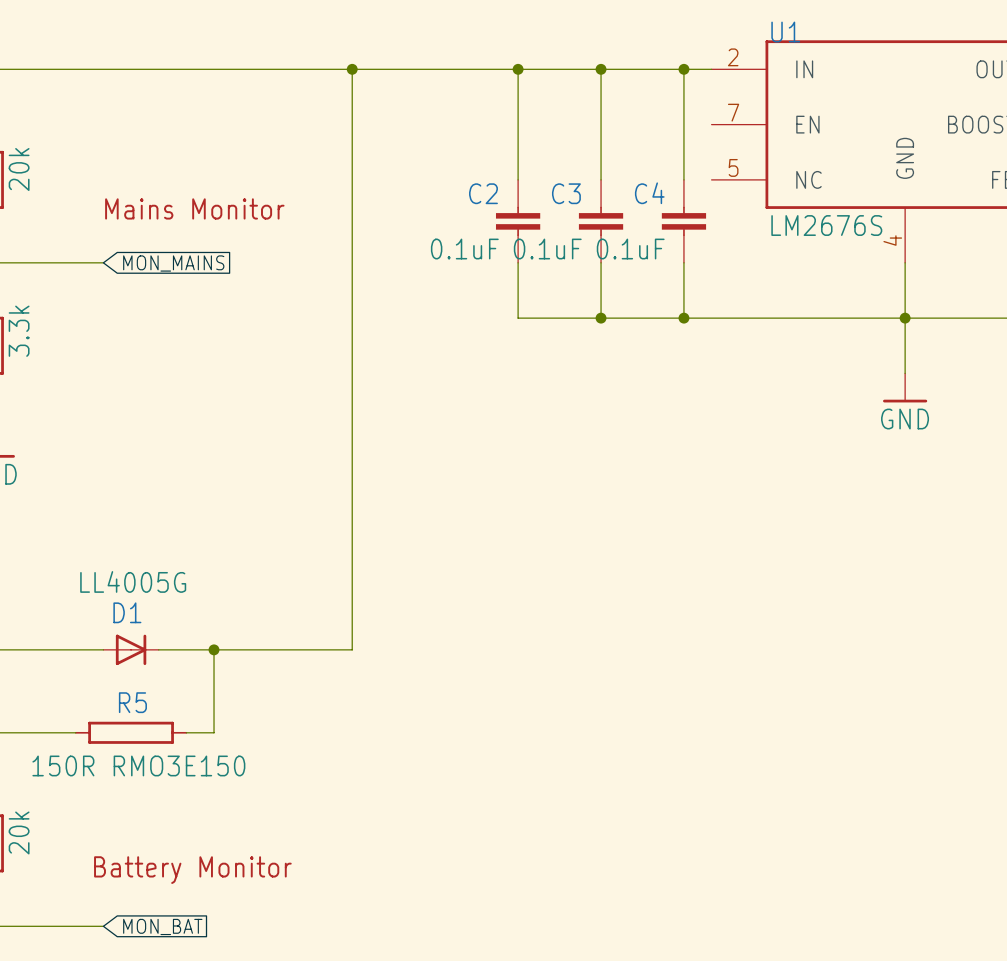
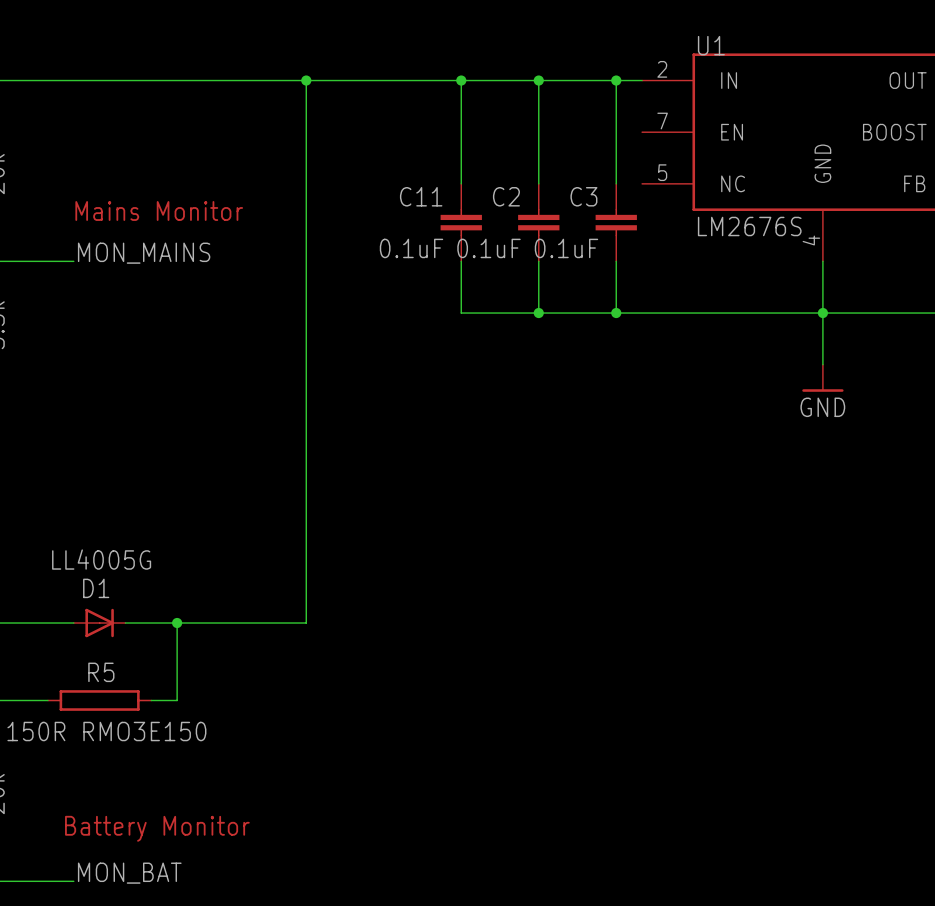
C2 name: C2 (483, 193) -> C11 (421, 196)
C3 name: C3 (566, 193) -> C2 (506, 196)
C4 name: C4 (649, 193) -> C3 (583, 196)
label: none -> MON_MAINS (144, 253)
global label: MON_MAINS (173, 263) -> none
label: none -> MON_BAT (129, 873)
global label: MON_BAT (162, 926) -> none

